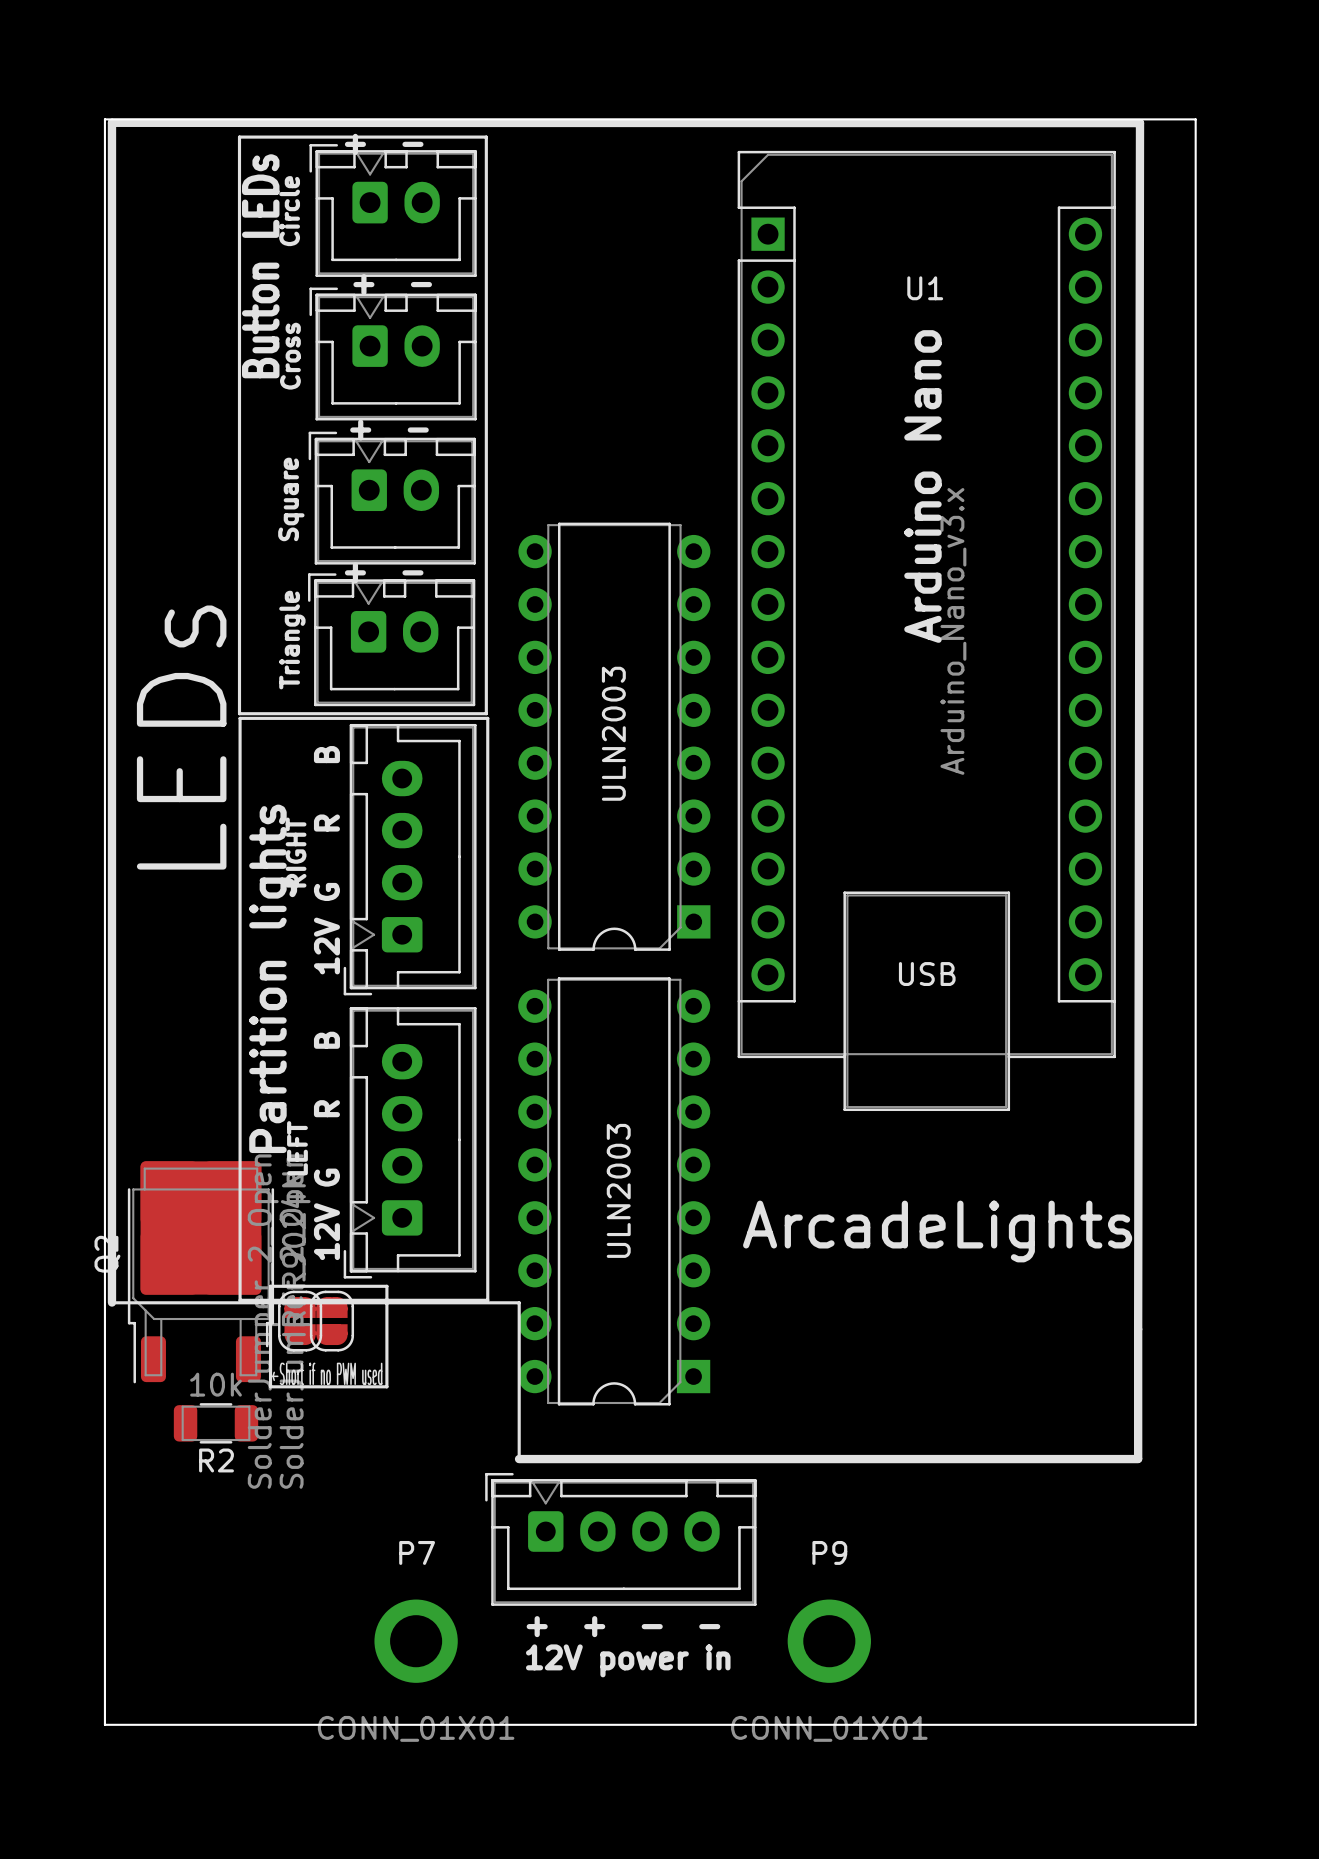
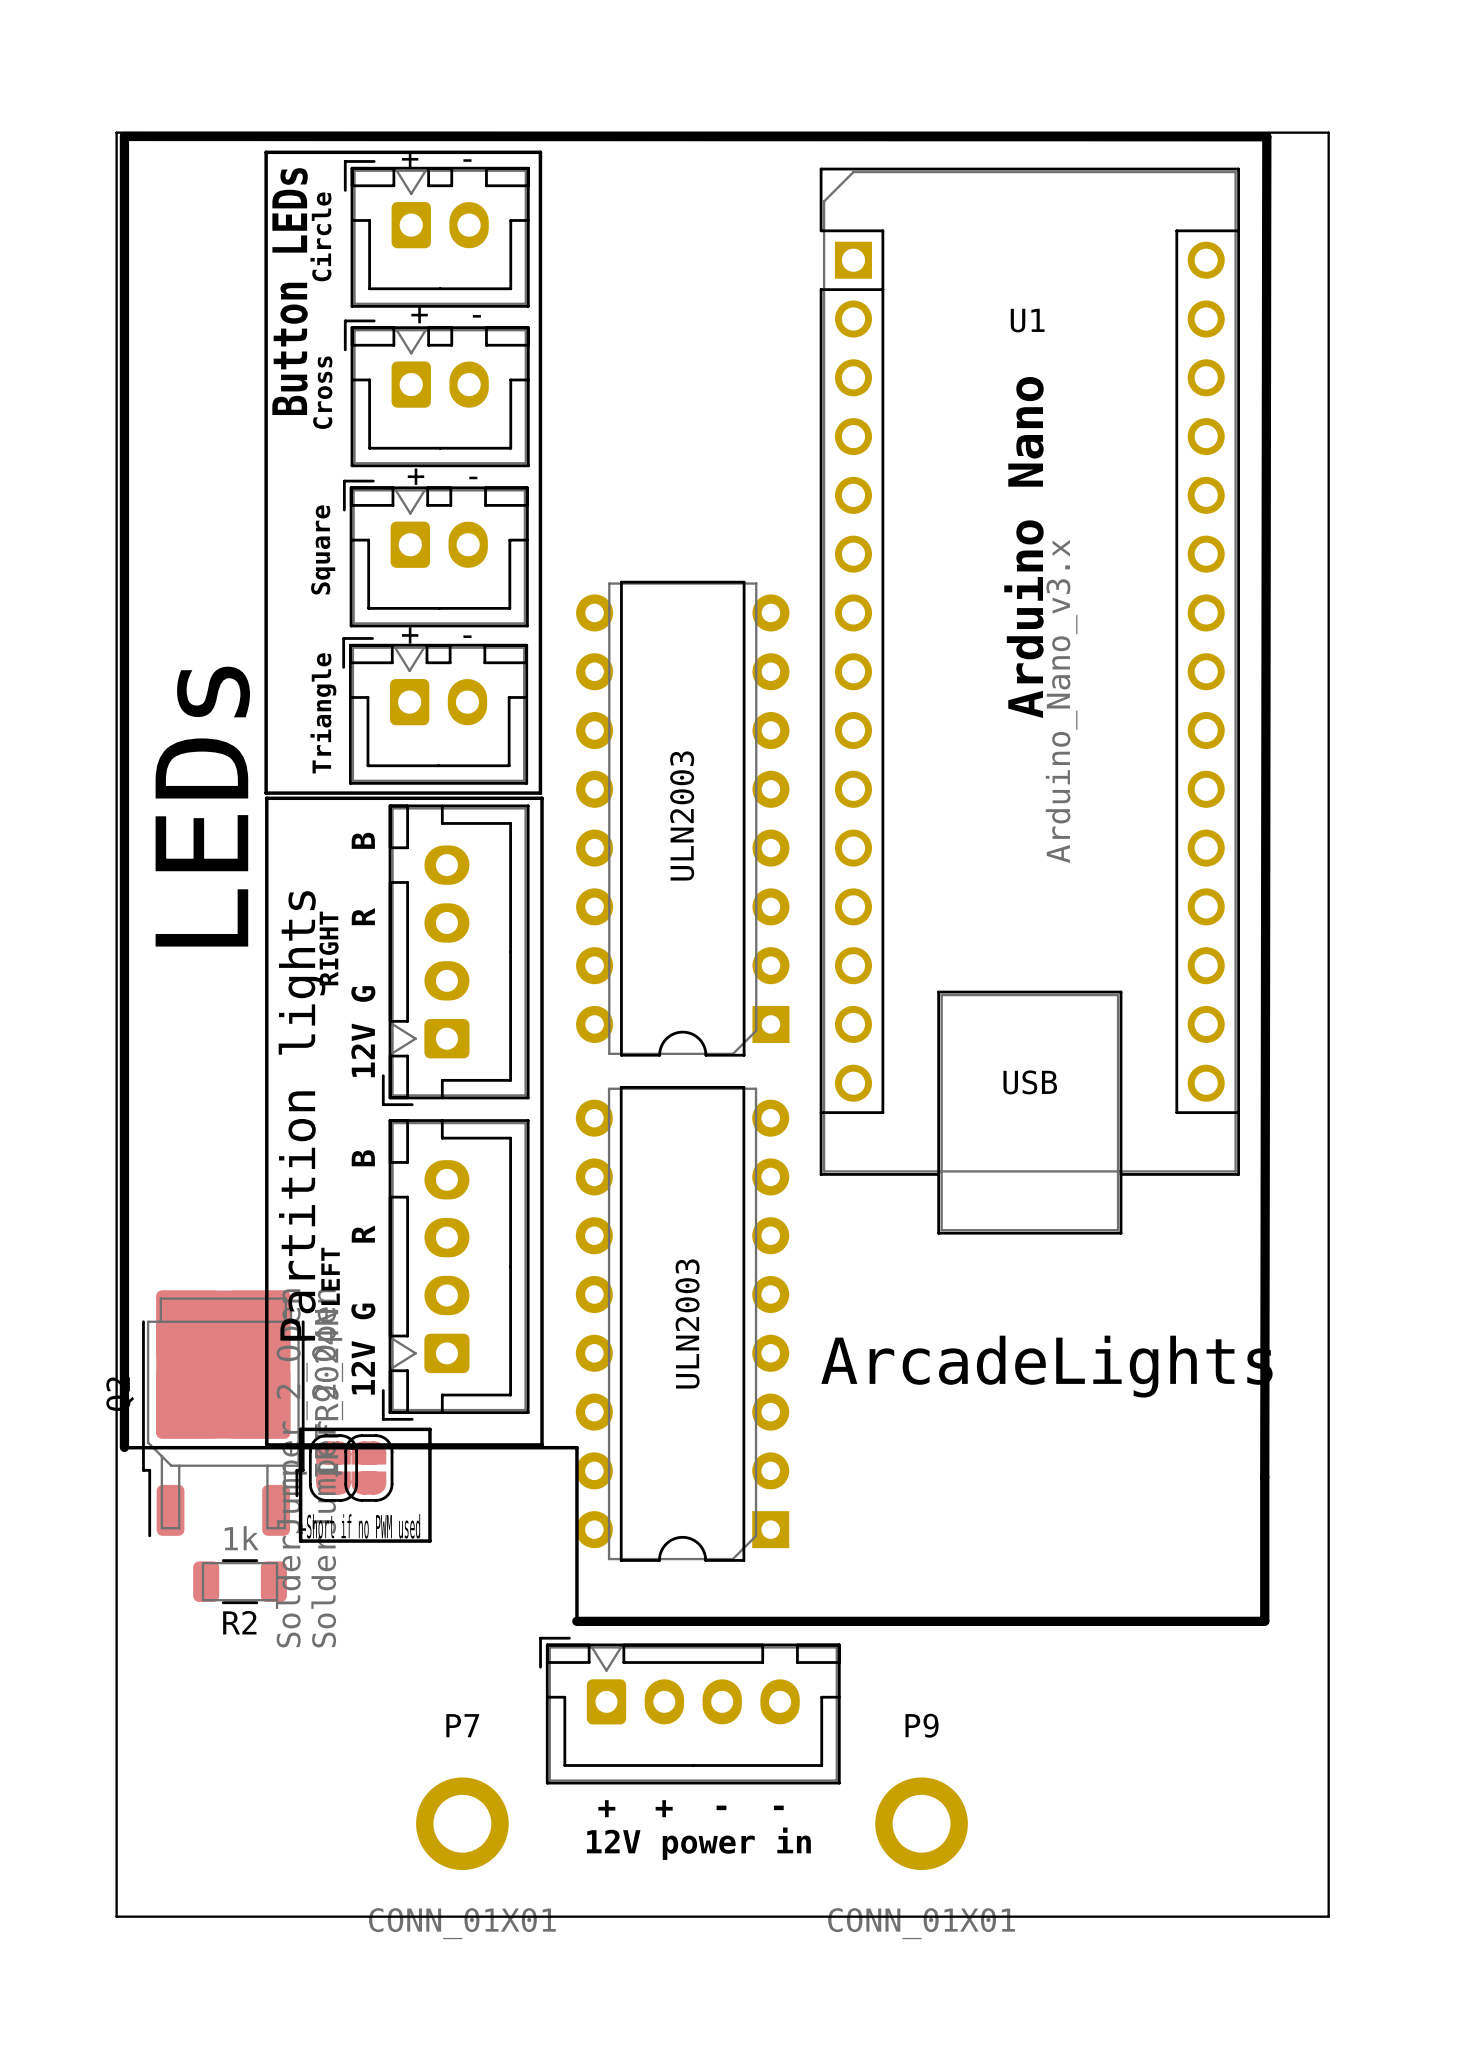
R2 value: 10k (216, 1384) -> 1k (241, 1538)

